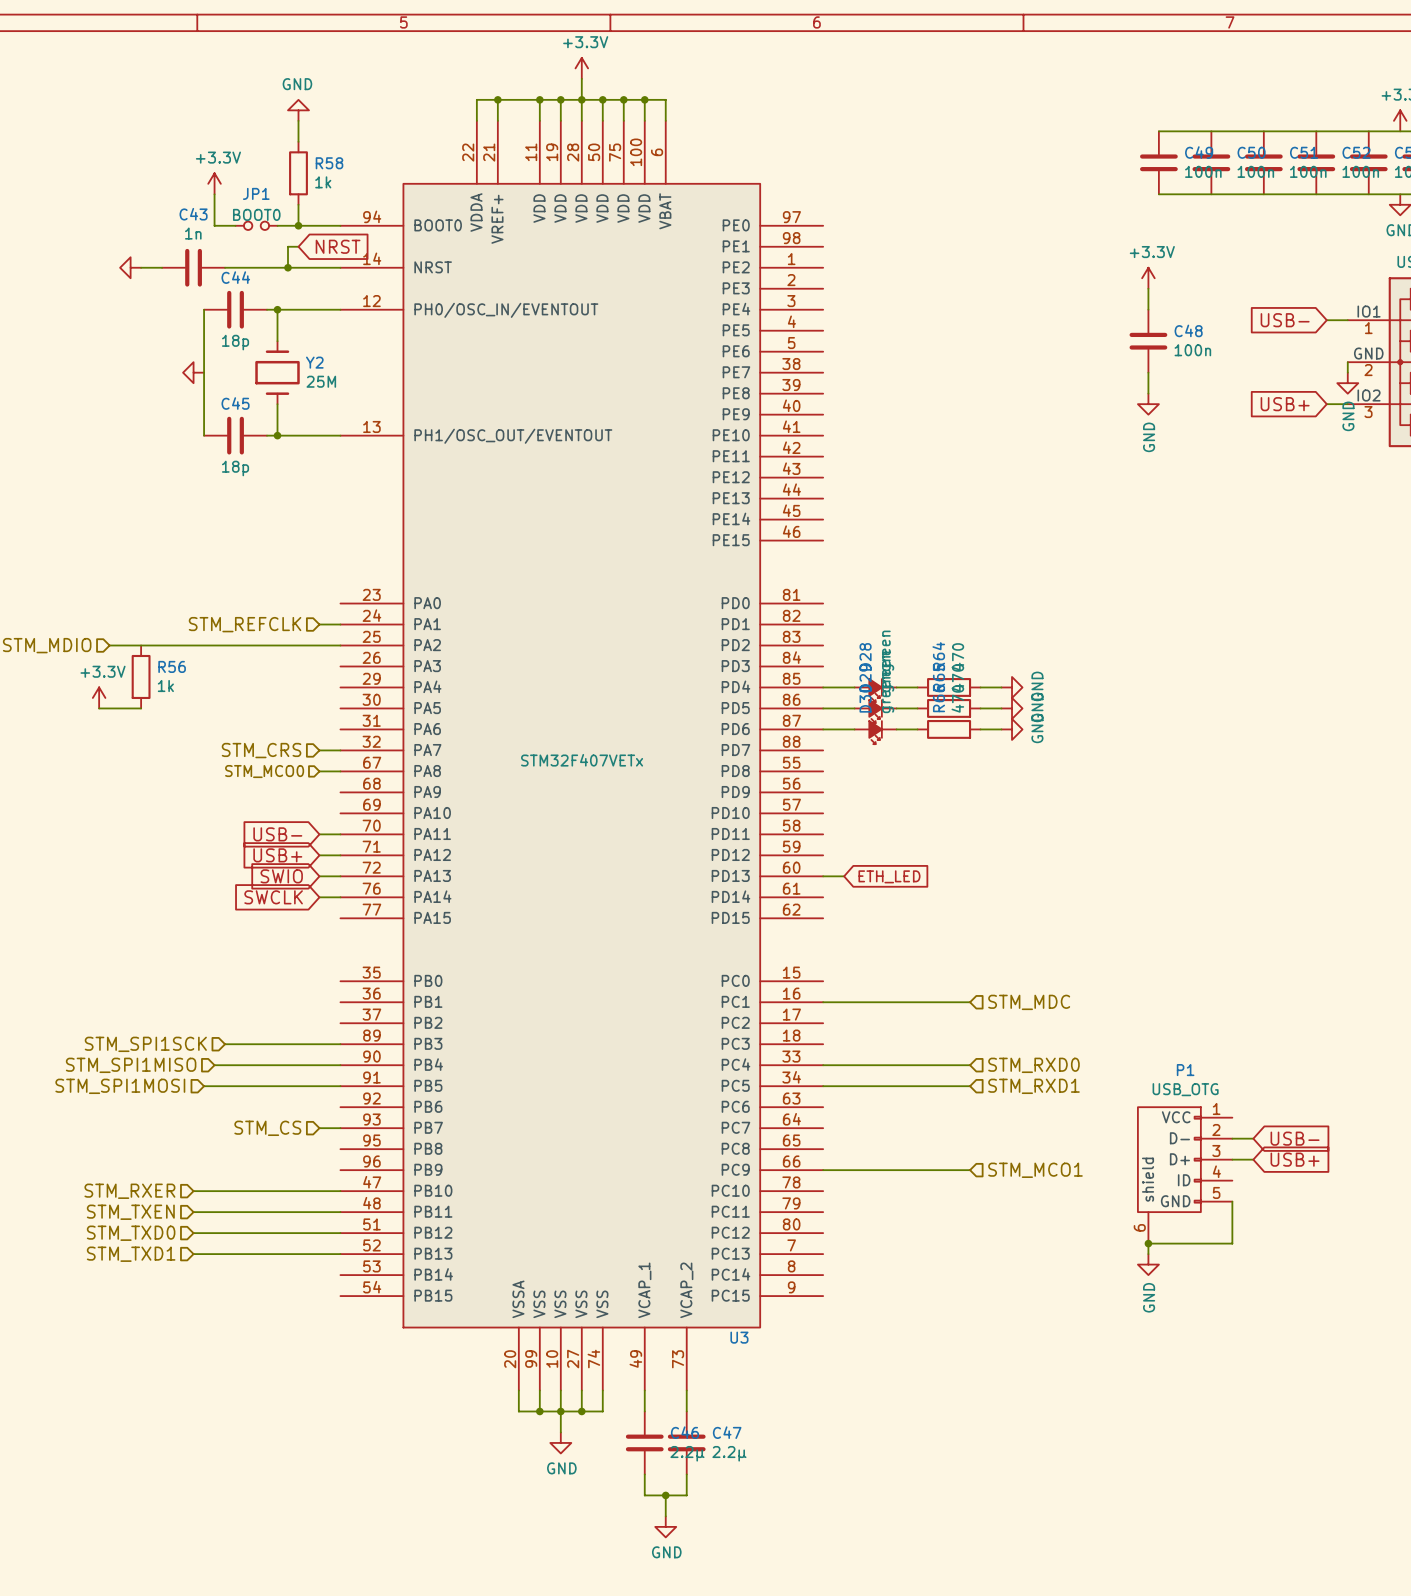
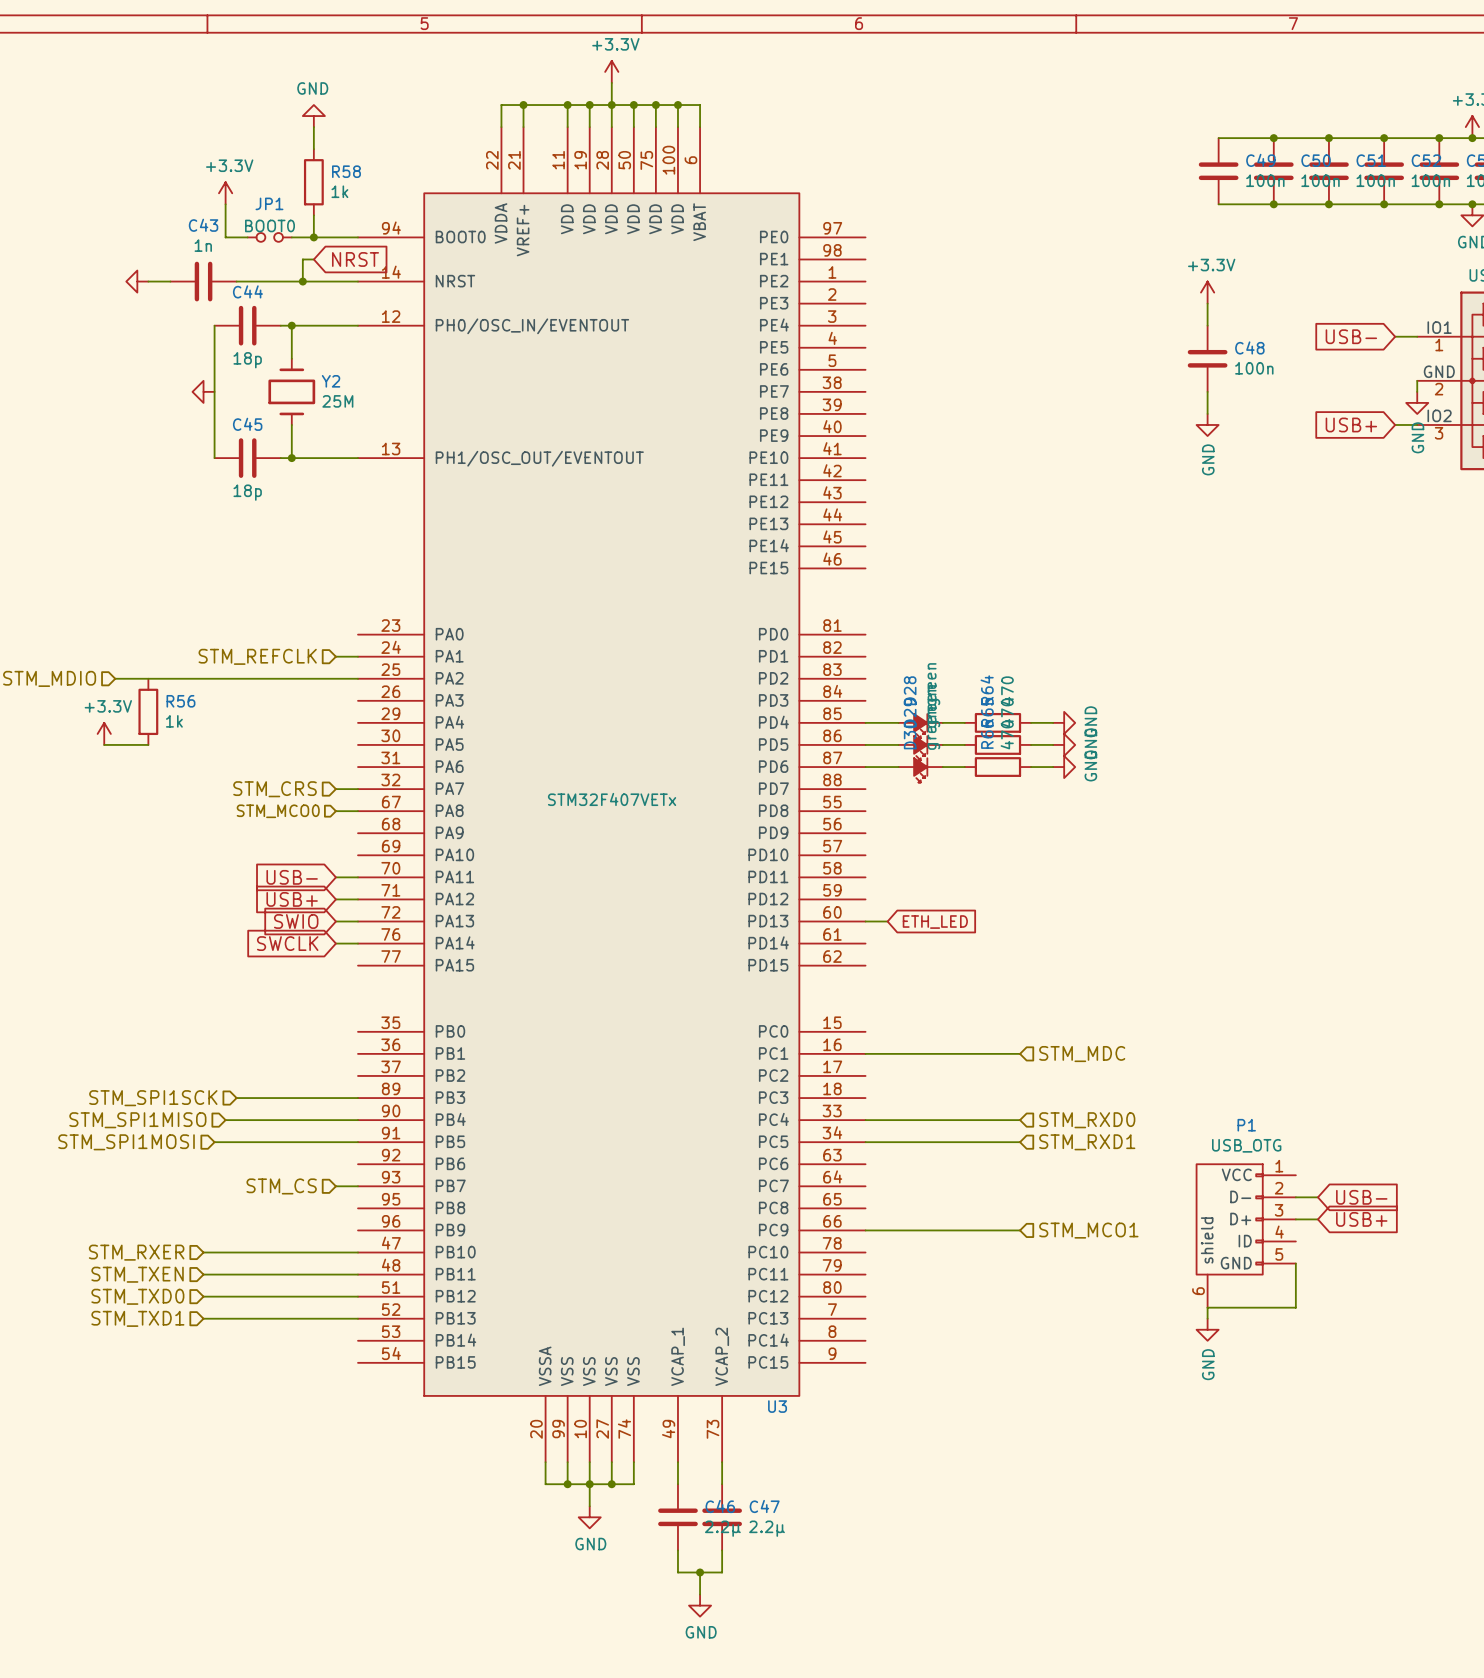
junction: none -> (1273, 138)
junction: none -> (1328, 138)
junction: none -> (1384, 138)
junction: none -> (1439, 138)
junction: none -> (1472, 138)
junction: none -> (1273, 204)
junction: none -> (1328, 204)
junction: none -> (1384, 204)
junction: none -> (1439, 204)
junction: none -> (1472, 204)
junction: (1148, 1243) -> none

